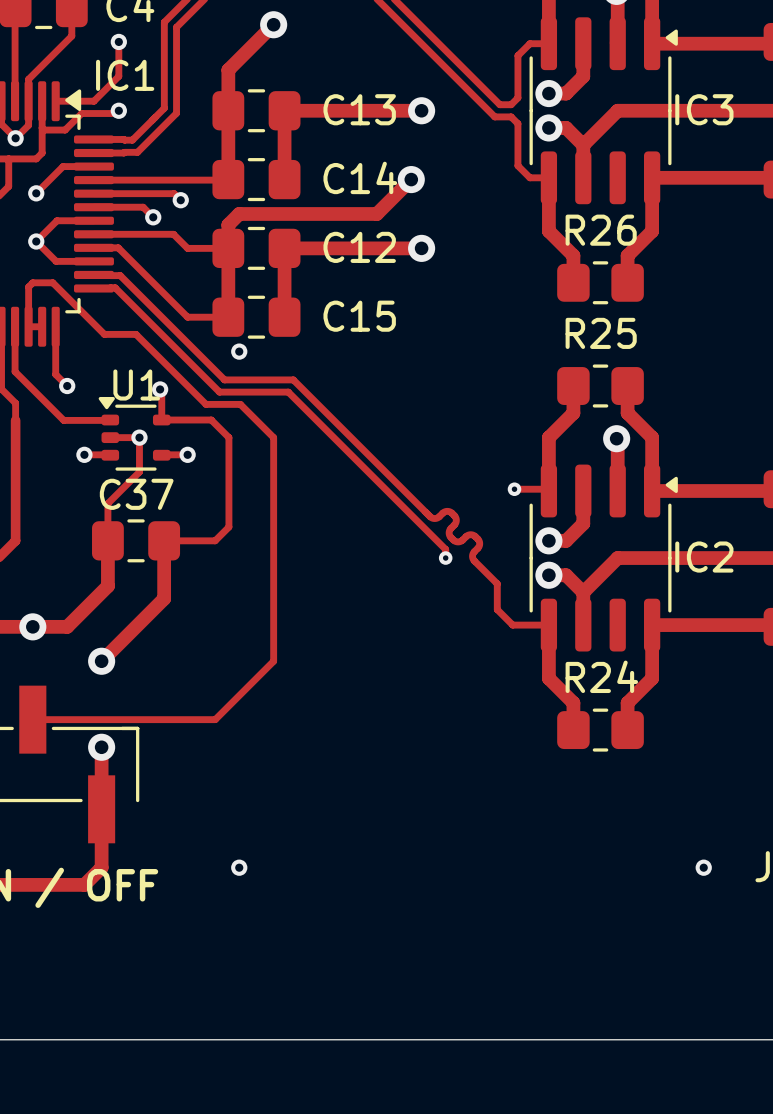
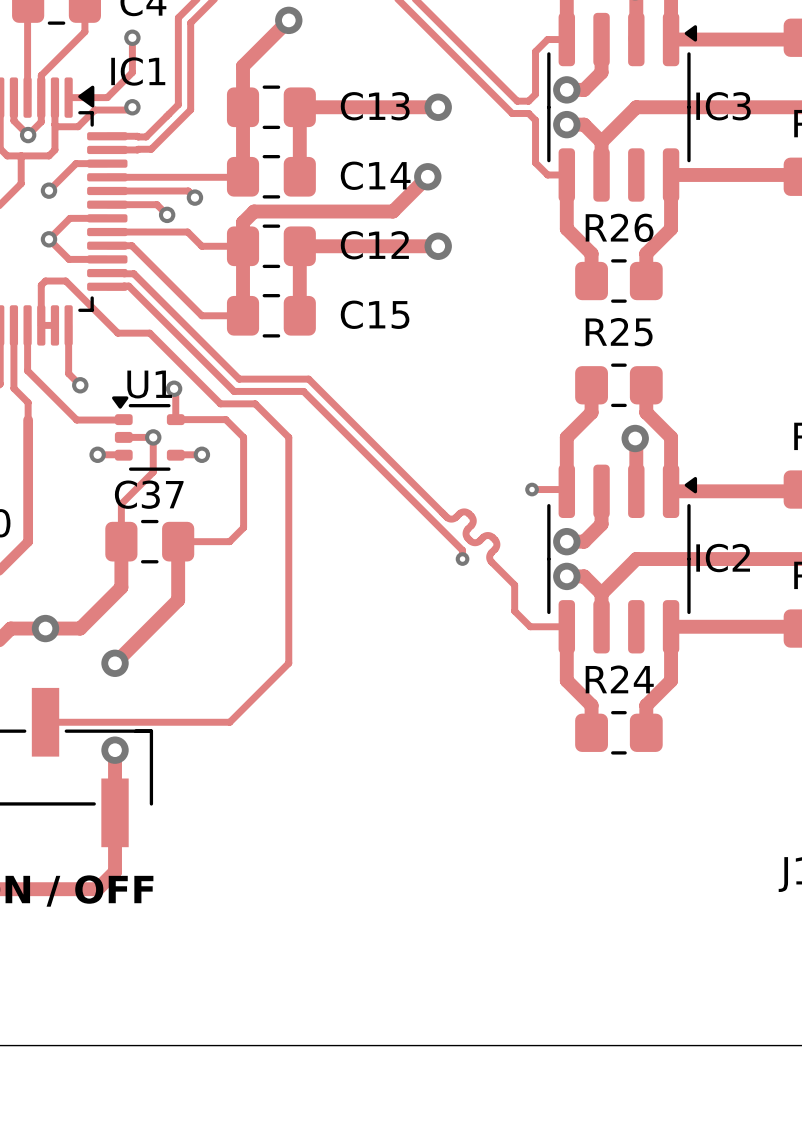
via: (239, 351) -> none
via: (239, 867) -> none
via: (703, 867) -> none

